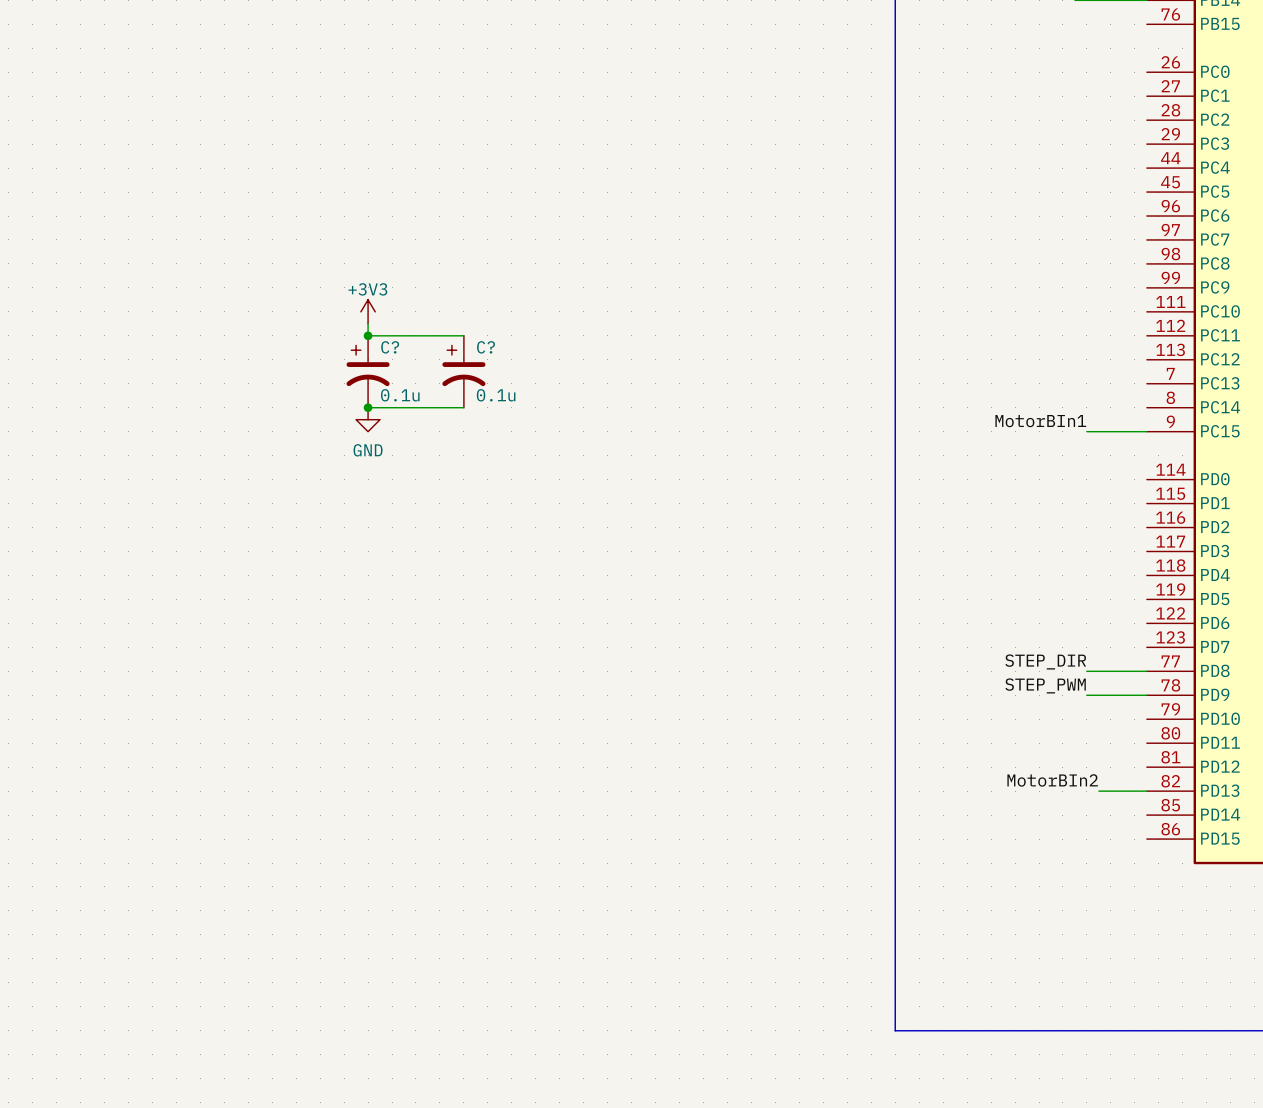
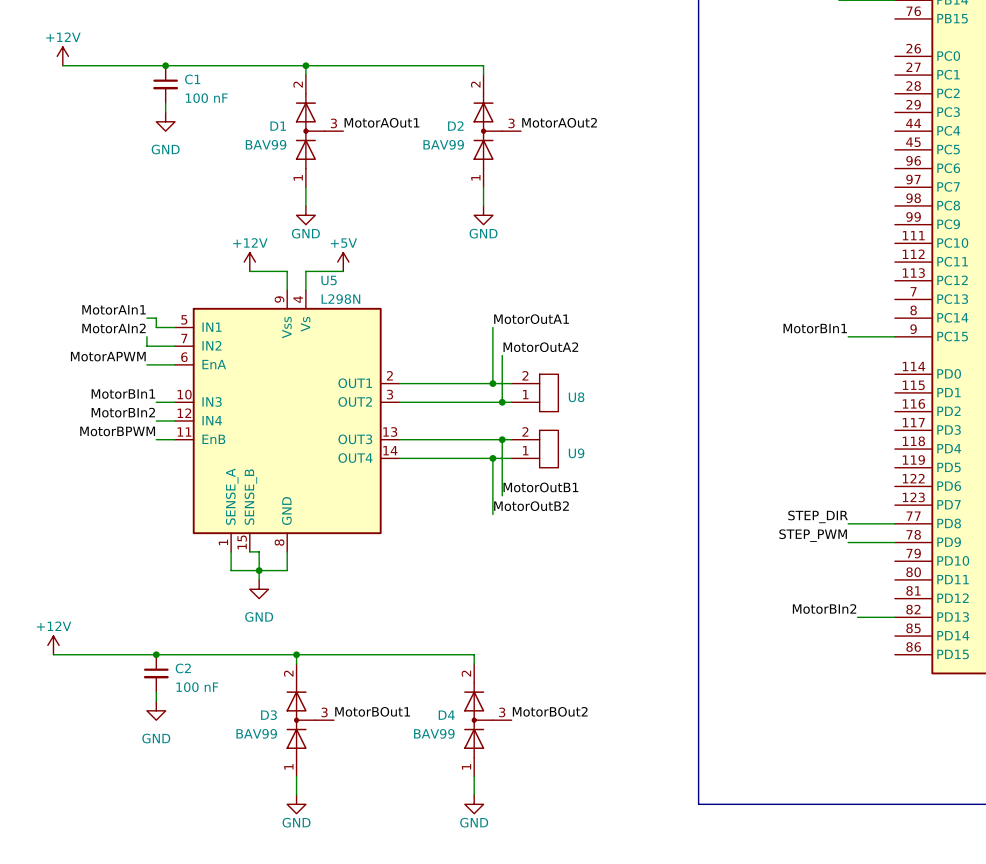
power symbol: none -> +12V (62, 56)
wire: none -> (62, 65) (483, 65) (483, 75)
junction: none -> (165, 65)
wire: none -> (305, 65) (305, 75)
junction: none -> (305, 65)
C1: none -> 100 nF (165, 84)
wire: none -> (165, 103) (165, 112)
power symbol: none -> GND (165, 121)
label: none -> MotorAOut1 (381, 122)
label: none -> MotorAOut2 (559, 122)
D1: none -> BAV99 (319, 131)
D2: none -> BAV99 (497, 131)
wire: none -> (305, 187) (305, 205)
wire: none -> (483, 187) (483, 205)
power symbol: none -> GND (305, 215)
power symbol: none -> GND (483, 215)
power symbol: +3V3 (368, 311) -> none
wire: (368, 323) (368, 335) (463, 335) -> none
power symbol: none -> +12V (249, 262)
junction: (368, 335) -> none
power symbol: none -> +5V (343, 262)
wire: none -> (249, 271) (287, 271) (287, 290)
wire: none -> (343, 271) (305, 271) (305, 290)
C?: 0.1u (368, 371) -> none
C?: 0.1u (463, 371) -> none
label: none -> MotorAIn1 (114, 309)
wire: none -> (146, 318) (156, 318) (156, 327) (175, 327)
junction: (368, 407) -> none
label: none -> MotorOutA1 (531, 319)
power symbol: GND (368, 419) -> none
wire: none -> (492, 327) (492, 383)
label: none -> MotorAIn2 (114, 328)
wire: none -> (146, 336) (146, 346) (175, 346)
label: none -> MotorOutA2 (540, 347)
wire: none -> (502, 355) (502, 402)
label: none -> MotorAPWM (108, 356)
wire: none -> (146, 364) (175, 364)
wire: none -> (399, 383) (511, 383)
junction: none -> (492, 383)
U8: none -> (534, 392)
label: none -> MotorBIn1 (123, 394)
wire: none -> (156, 402) (175, 402)
wire: none -> (399, 402) (511, 402)
junction: none -> (502, 402)
label: none -> MotorBIn2 (123, 412)
wire: none -> (156, 420) (175, 420)
U5: none -> L298N (287, 420)
label: none -> MotorBPWM (117, 431)
wire: none -> (156, 439) (175, 439)
wire: none -> (399, 439) (511, 439)
wire: none -> (502, 439) (502, 495)
junction: none -> (502, 439)
U9: none -> (534, 449)
wire: none -> (399, 458) (511, 458)
wire: none -> (492, 458) (492, 514)
junction: none -> (492, 458)
label: none -> MotorOutB1 (540, 487)
label: none -> MotorOutB2 (531, 506)
wire: none -> (231, 551) (231, 570) (287, 570) (287, 551)
wire: none -> (249, 551) (259, 551) (259, 579)
junction: none -> (259, 570)
power symbol: none -> GND (259, 589)
power symbol: none -> +12V (53, 645)
wire: none -> (53, 654) (474, 654) (474, 664)
junction: none -> (156, 654)
wire: none -> (296, 654) (296, 664)
junction: none -> (296, 654)
C2: none -> 100 nF (156, 673)
wire: none -> (156, 692) (156, 701)
power symbol: none -> GND (156, 710)
label: none -> MotorBOut1 (372, 711)
label: none -> MotorBOut2 (550, 711)
D3: none -> BAV99 (310, 720)
D4: none -> BAV99 (487, 720)
wire: none -> (296, 776) (296, 794)
wire: none -> (474, 776) (474, 794)
power symbol: none -> GND (296, 804)
power symbol: none -> GND (474, 804)

